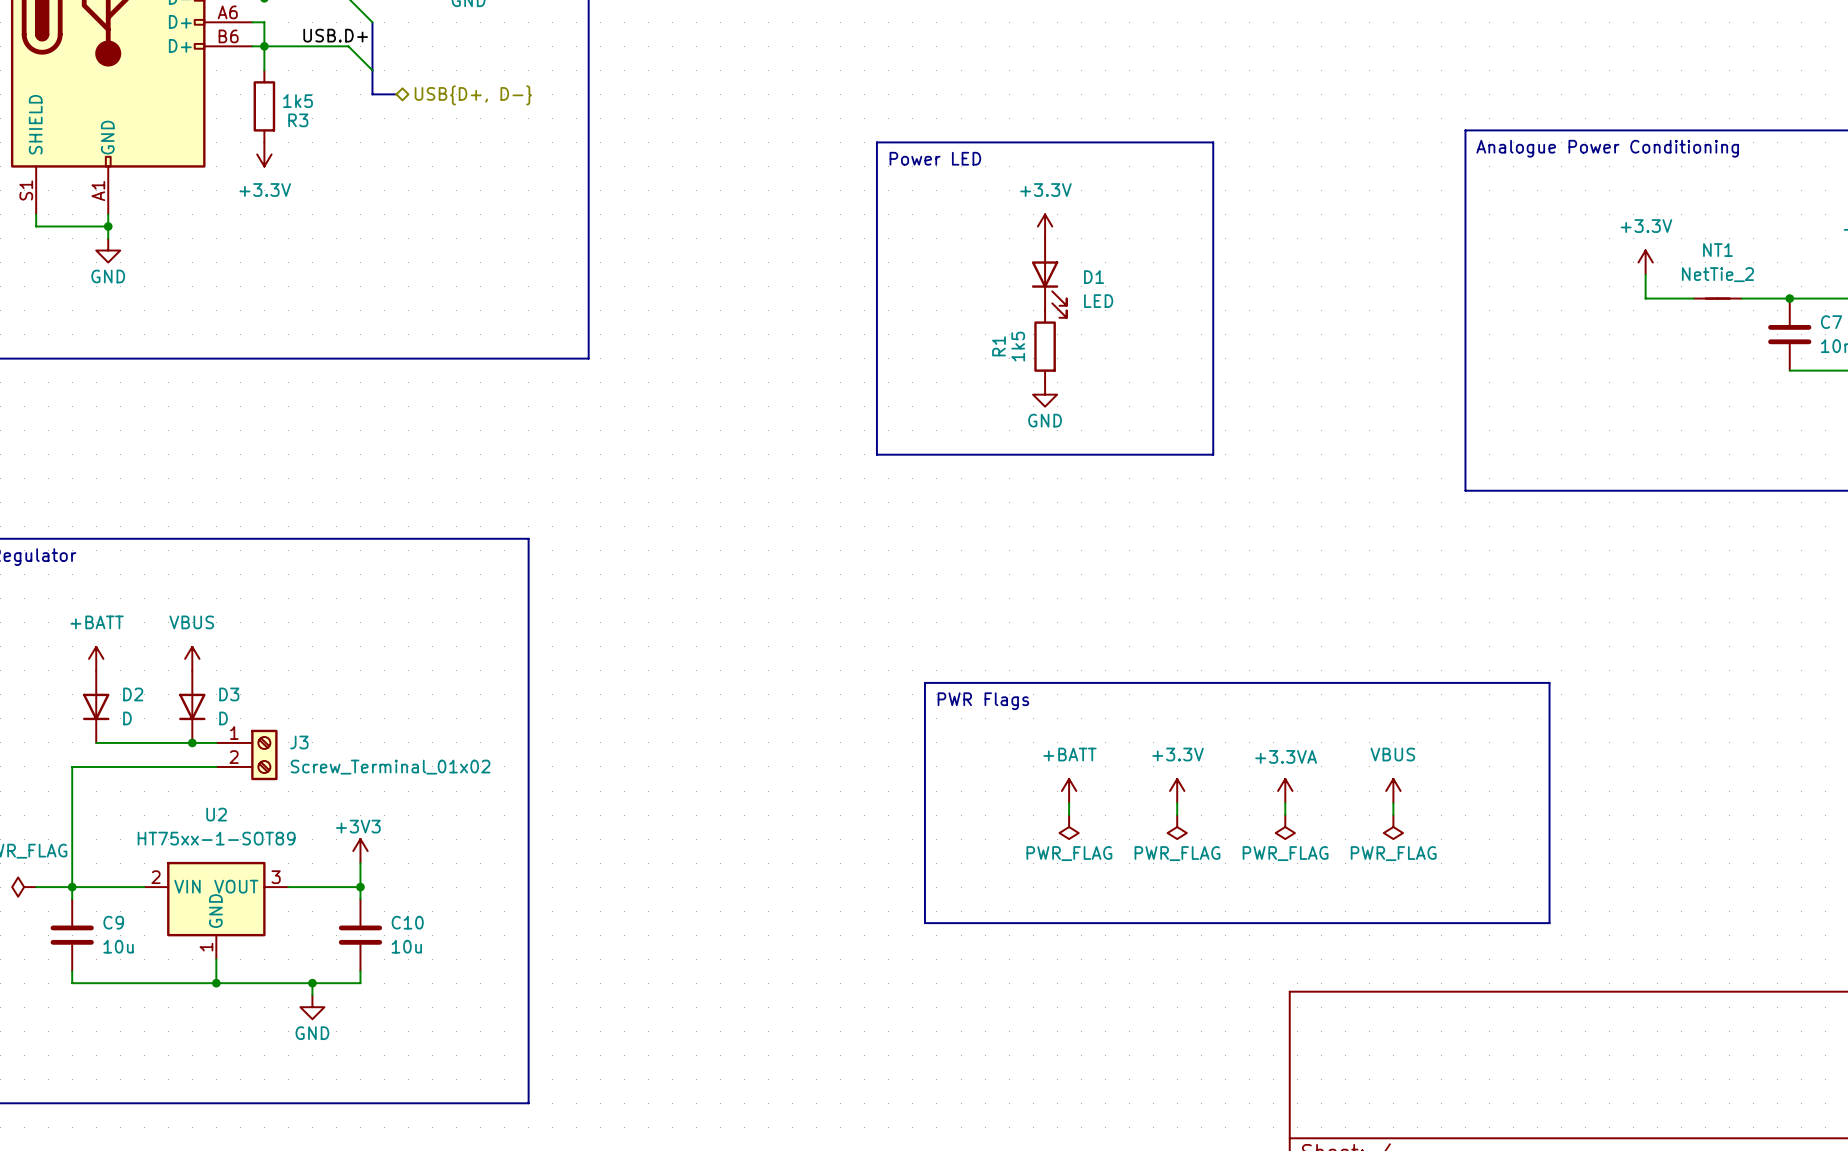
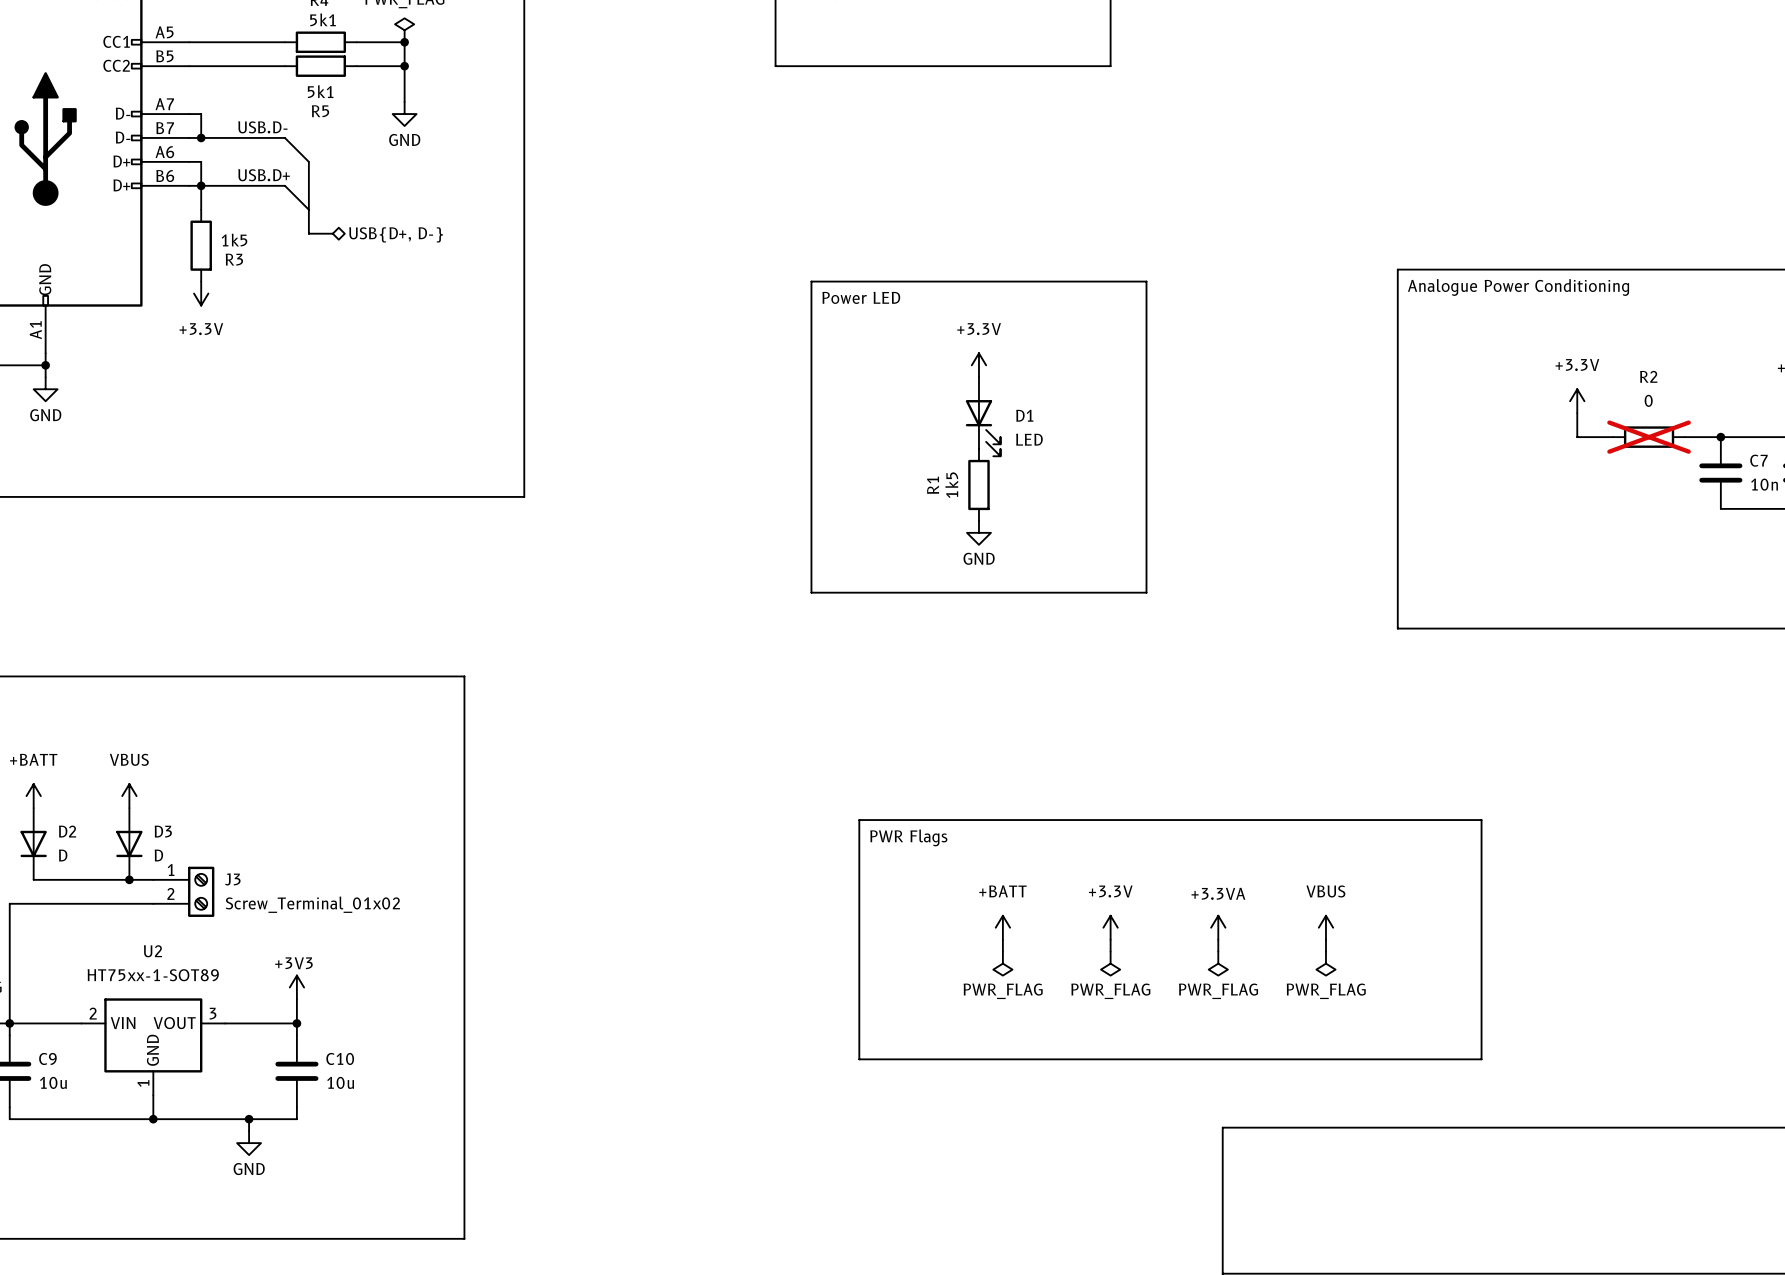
NT1: NetTie_2 (1717, 298) -> none
R2: none -> 0 (1649, 437)

